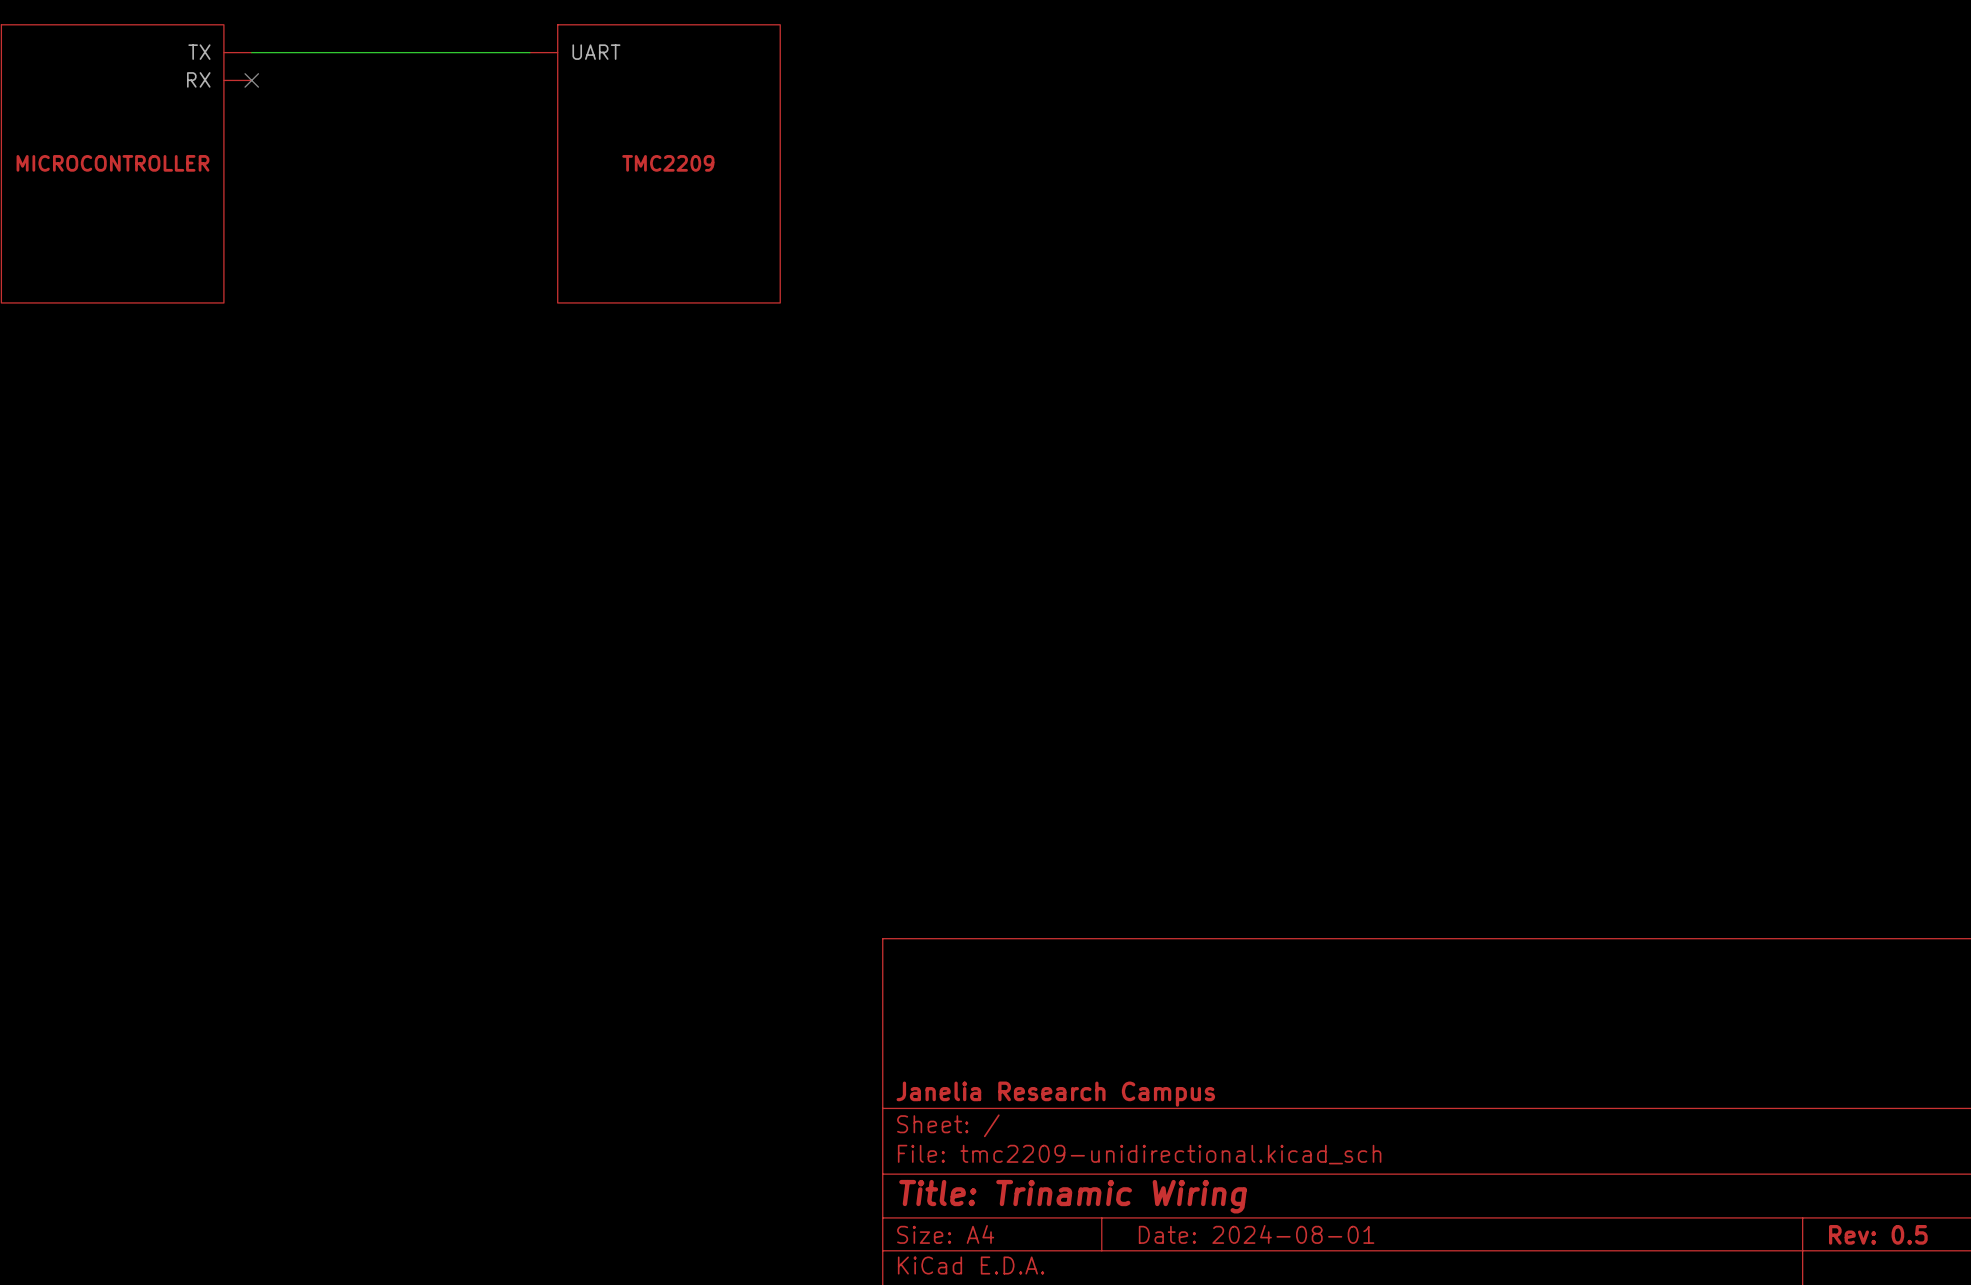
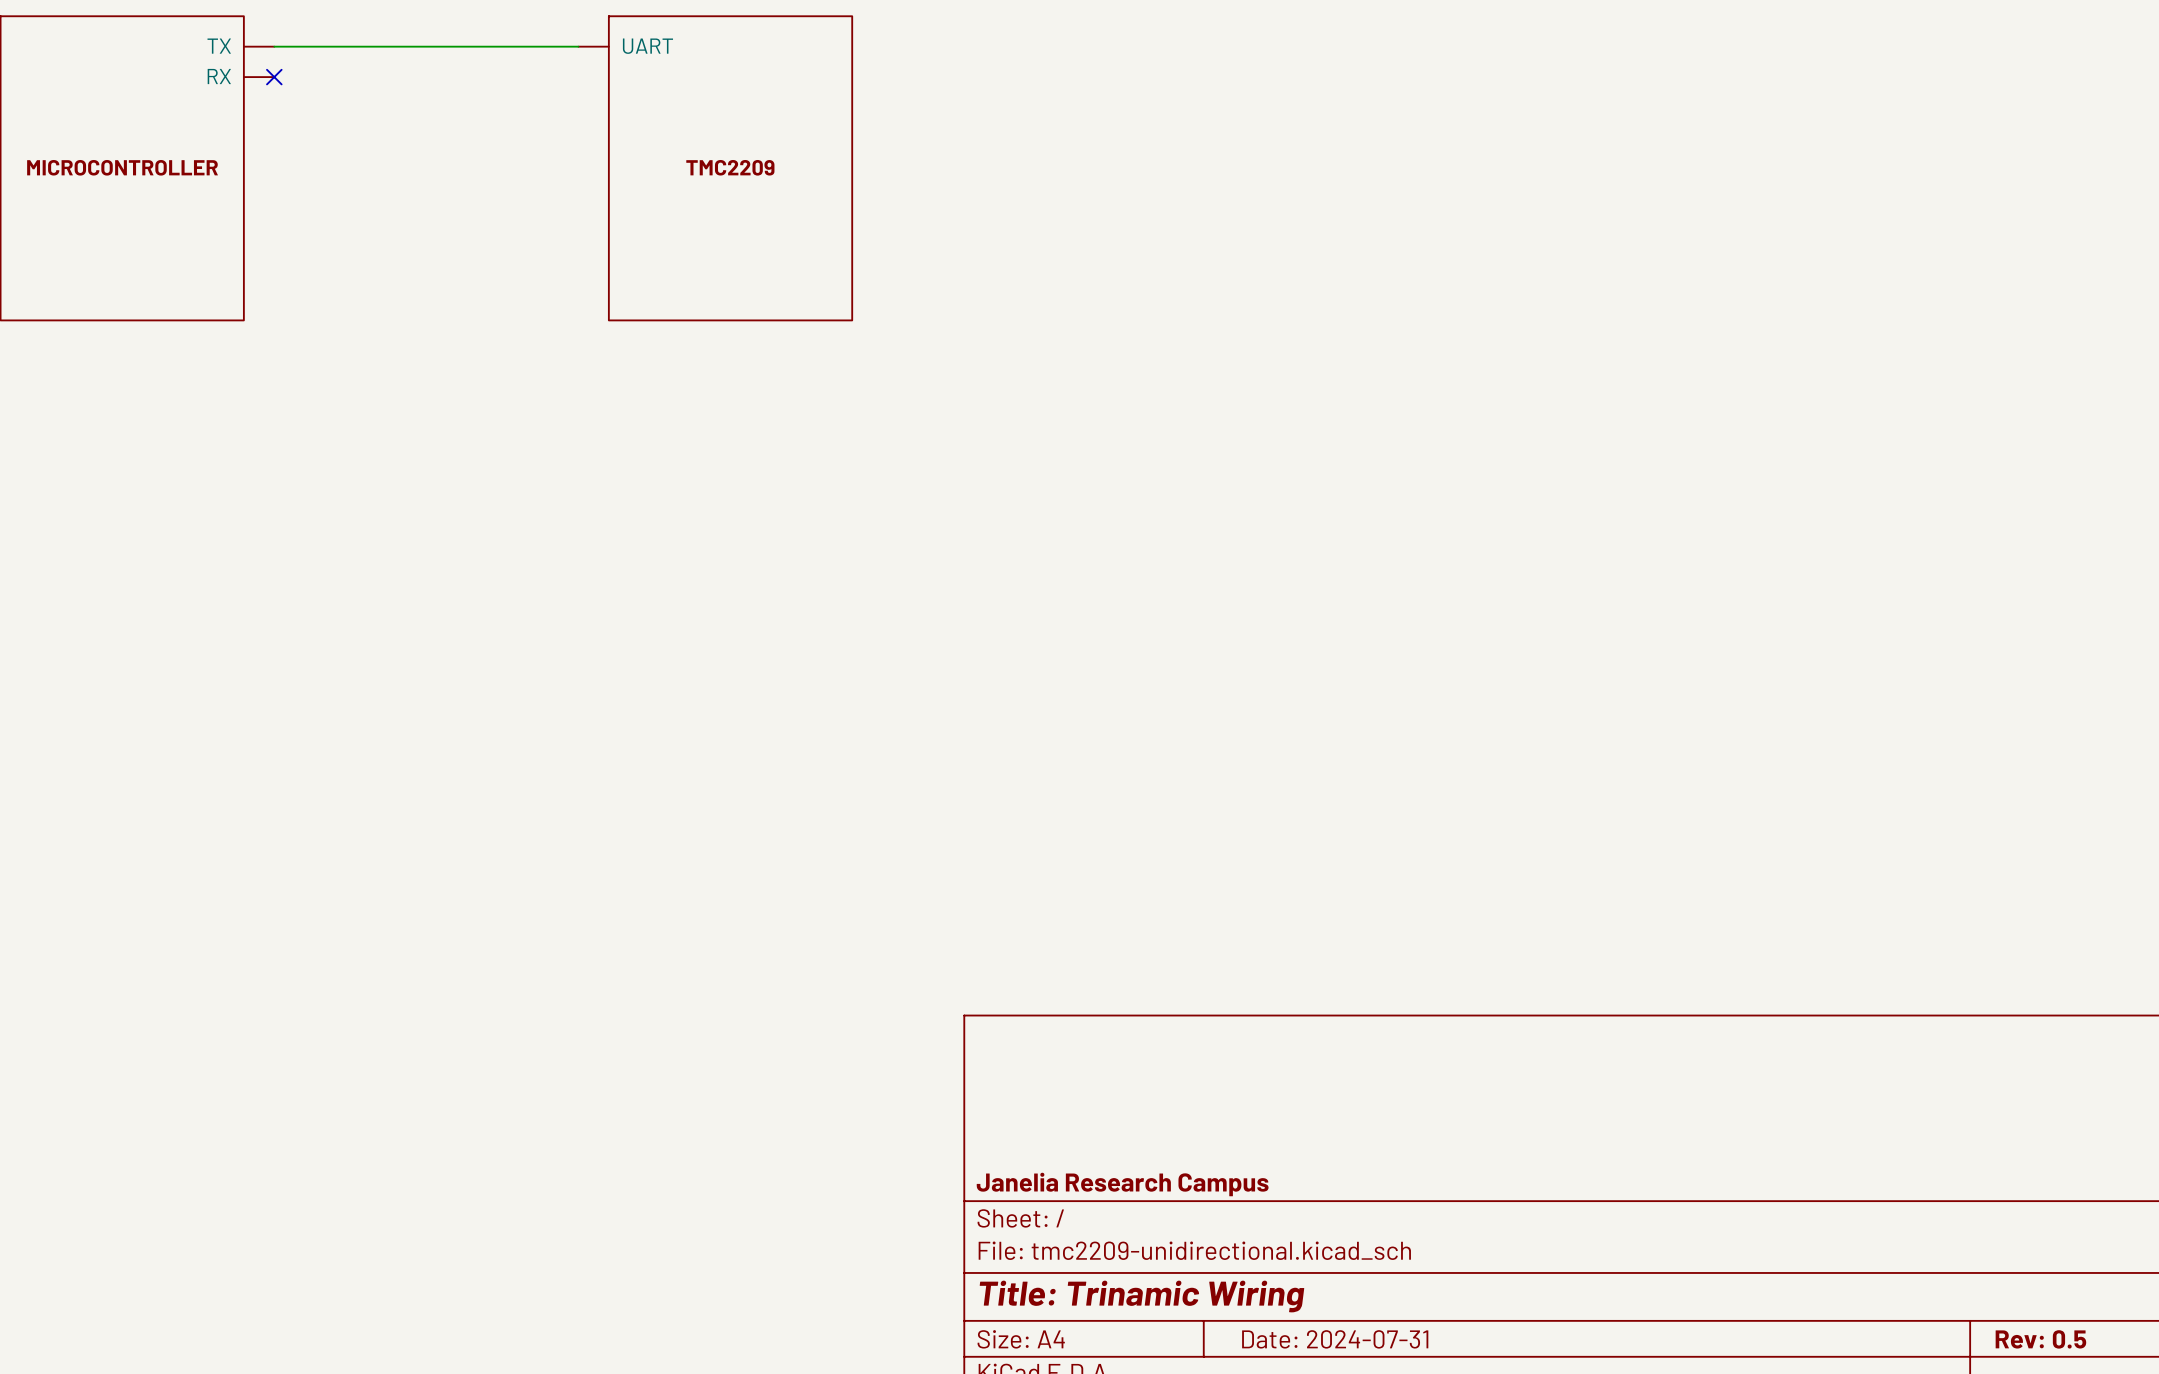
title block: Date: 2024-08-01 (1256, 1234) -> Date: 2024-07-31 (1335, 1339)

